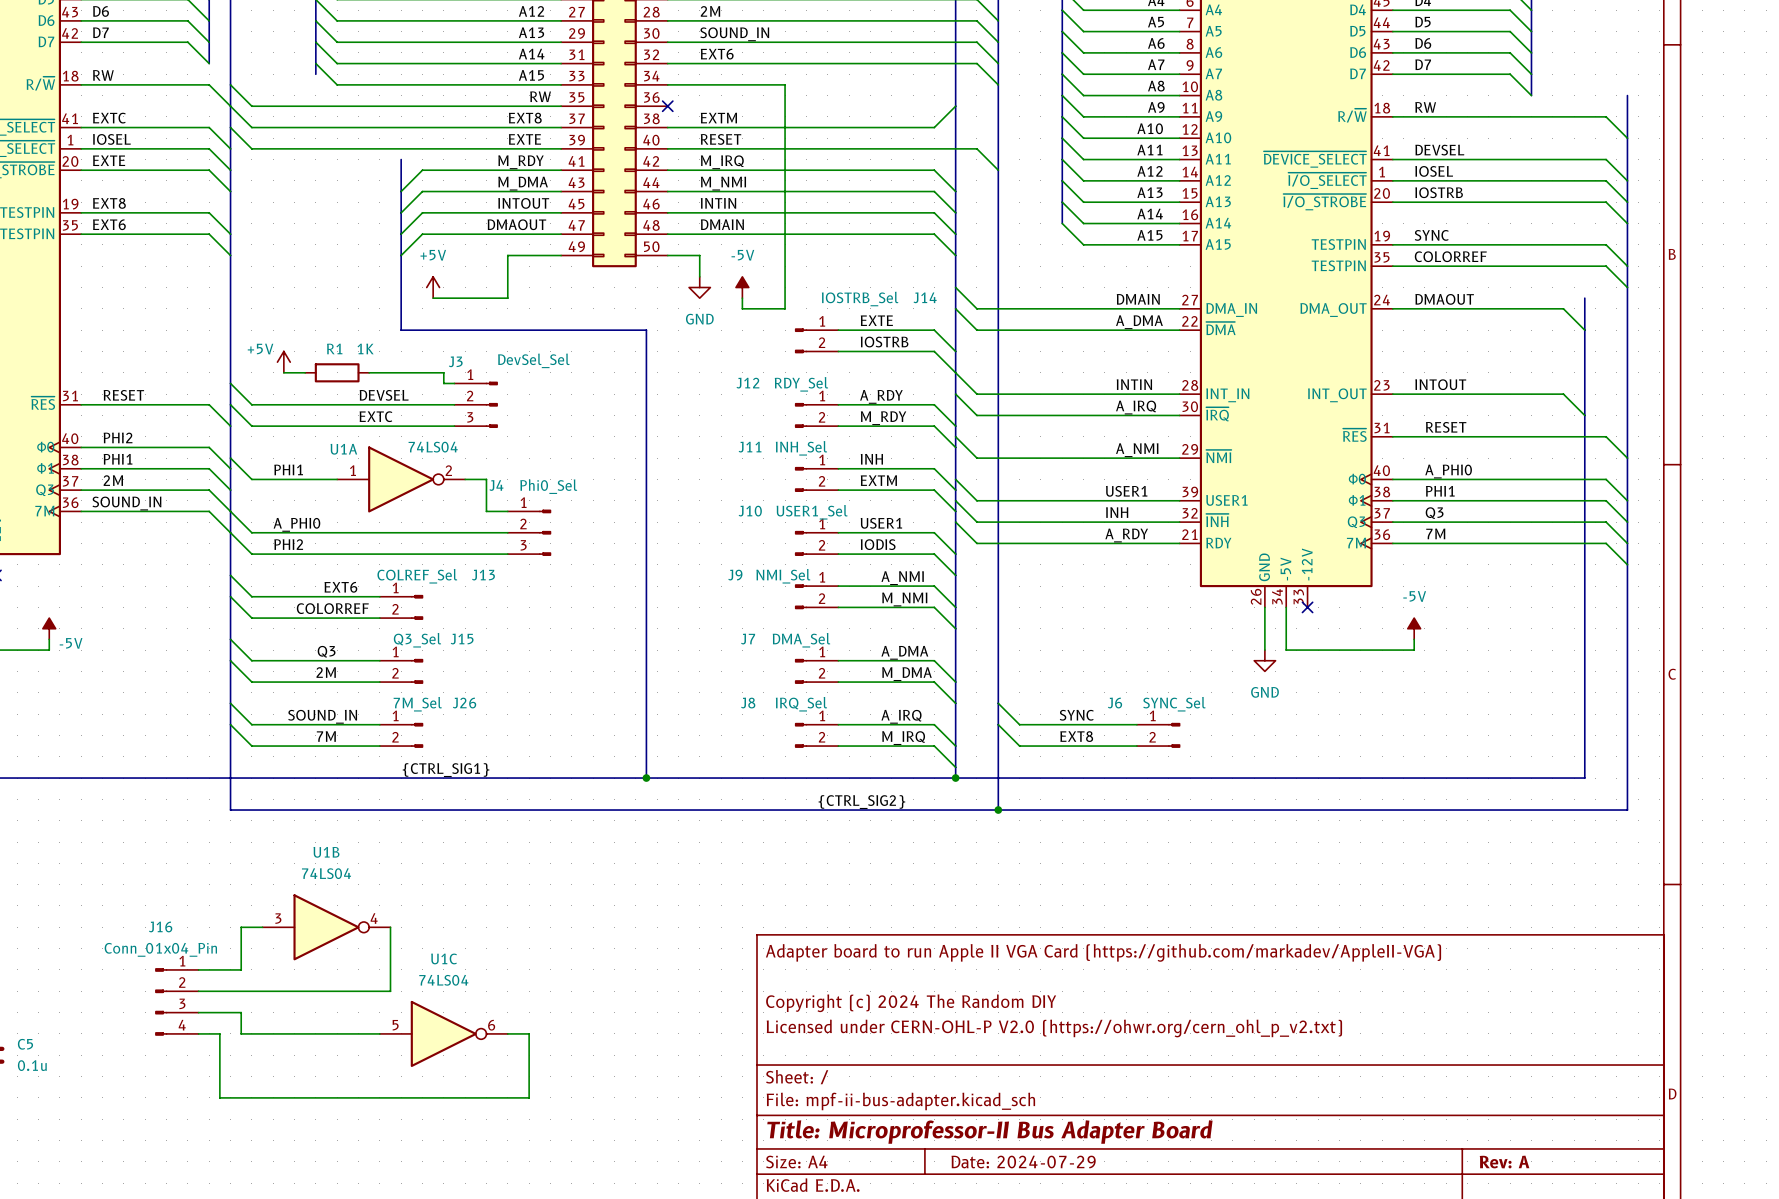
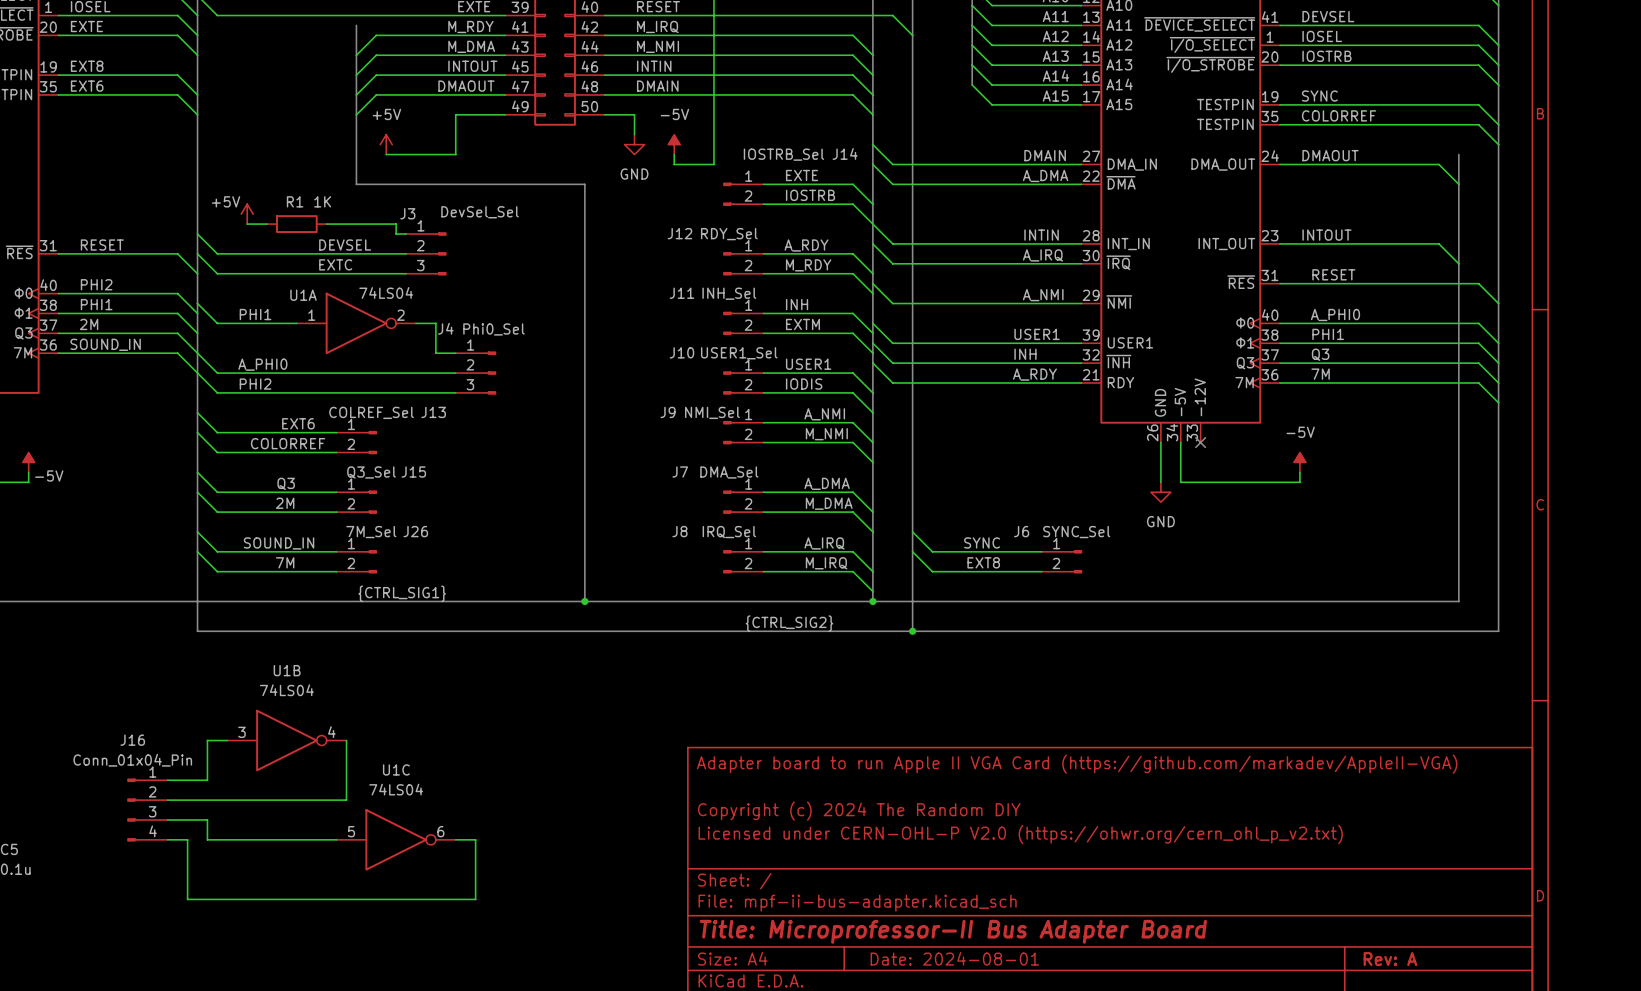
title block: Date: 2024-07-29 (1023, 1162) -> Date: 2024-08-01 (954, 958)

